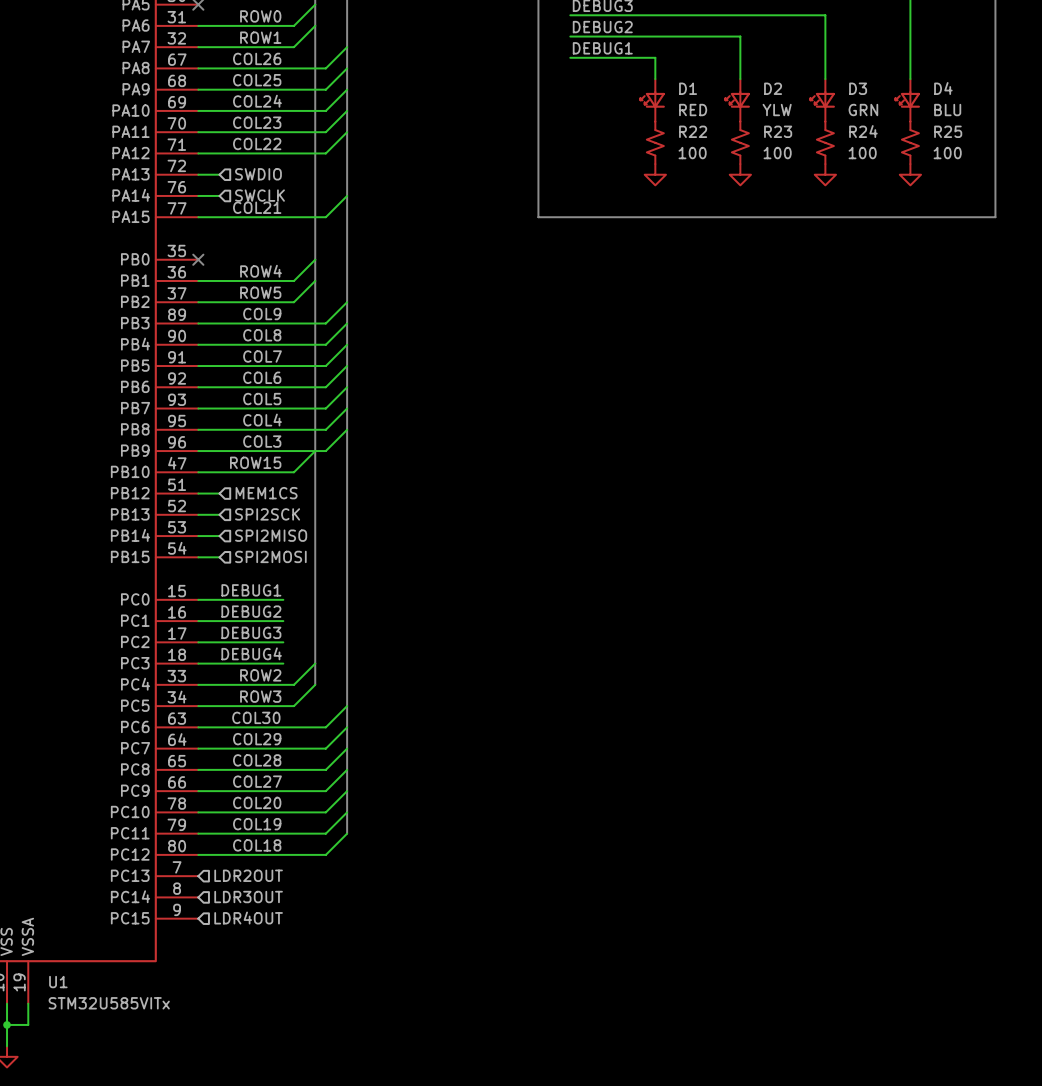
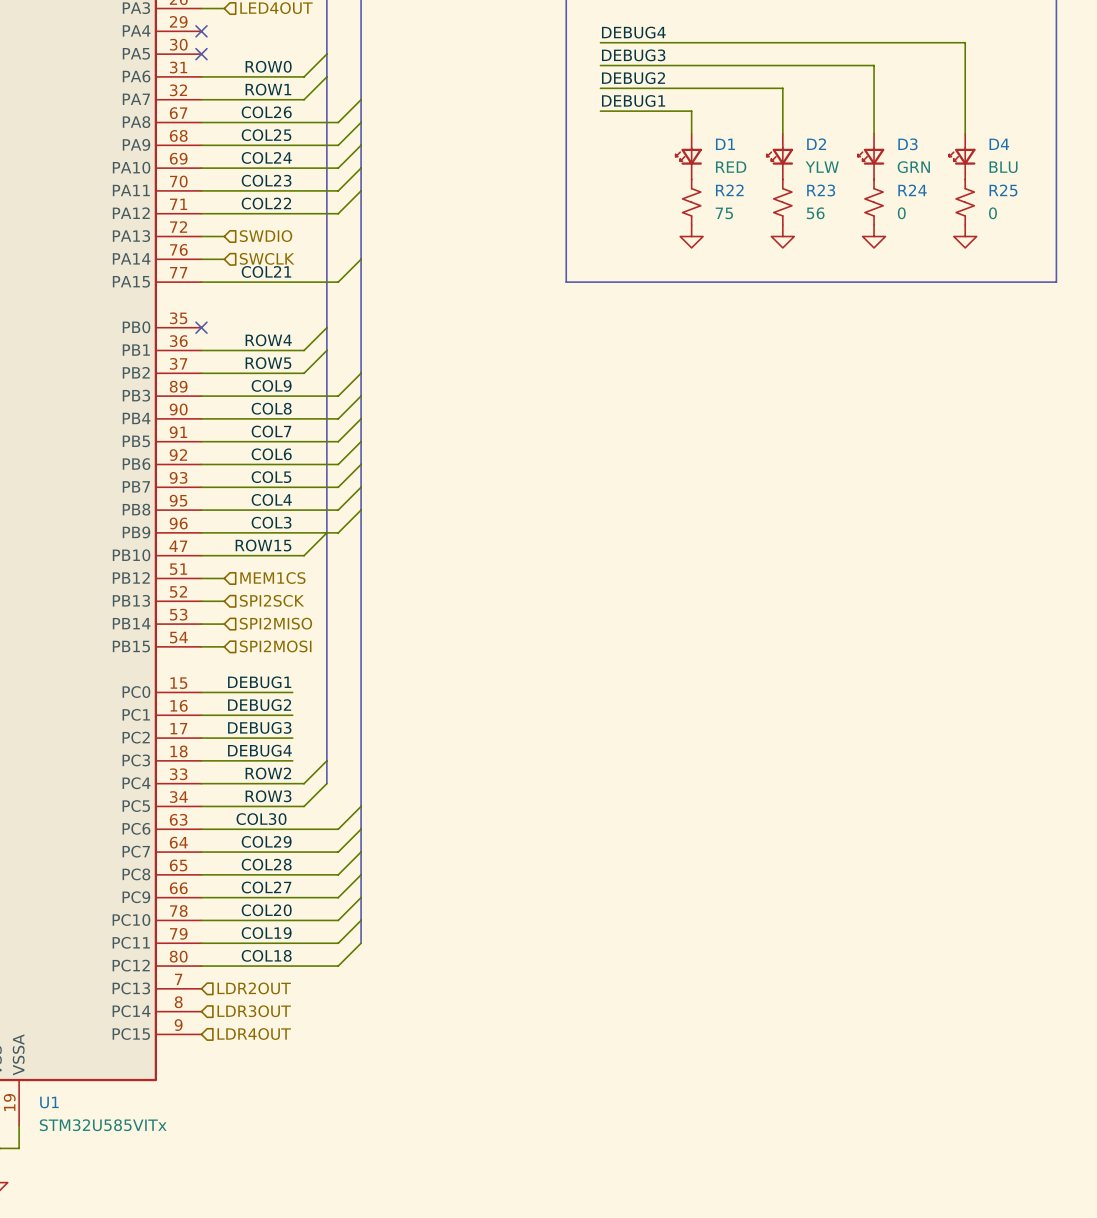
R22 value: 100 (692, 153) -> 75 (724, 213)
R23 value: 100 (777, 153) -> 56 (815, 213)
R24 value: 100 (862, 153) -> 0 (901, 213)
R25 value: 100 (947, 153) -> 0 (992, 213)

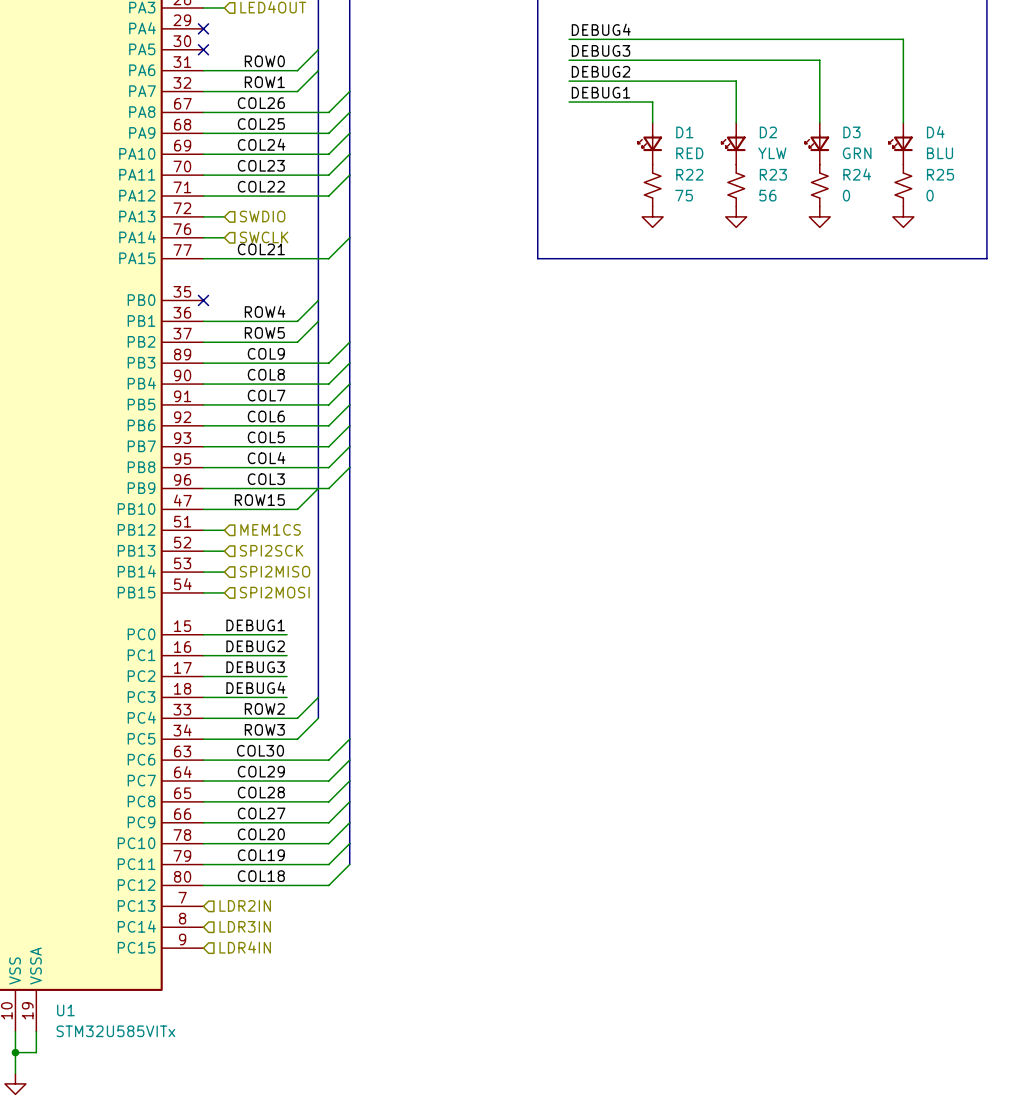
hierarchical label: LDR2OUT (254, 988) -> LDR2IN (245, 905)
hierarchical label: LDR3OUT (254, 1011) -> LDR3IN (245, 926)
hierarchical label: LDR4OUT (254, 1034) -> LDR4IN (245, 947)

